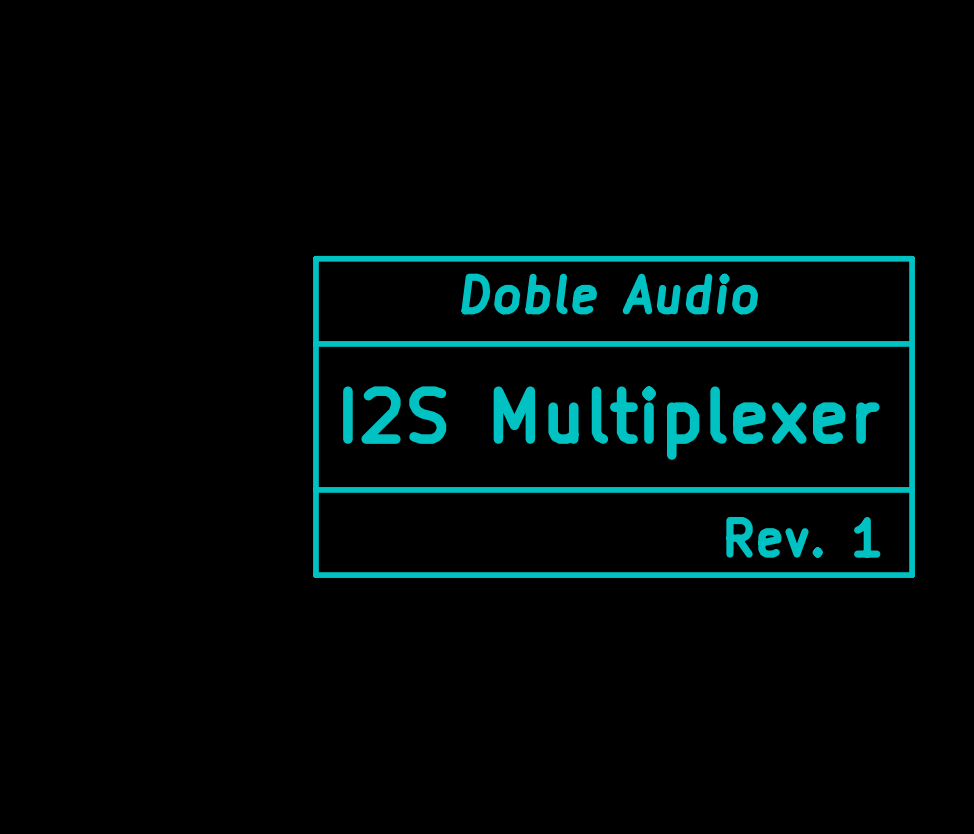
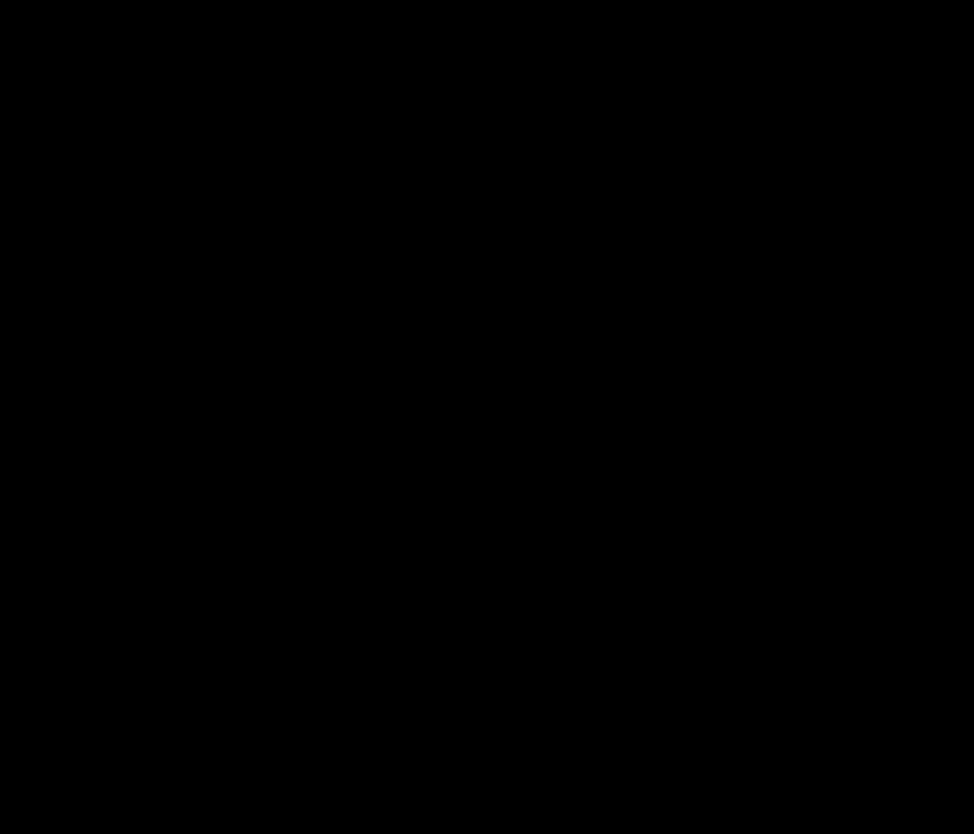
line: (315, 258) (315, 575) (912, 575) (912, 258) (315, 258) -> none
text: Doble Audio (609, 294) -> none
line: (315, 343) (912, 343) -> none
text: I2S Multiplexer (611, 423) -> none
line: (315, 489) (912, 489) -> none
text: Rev. 1 (803, 537) -> none

